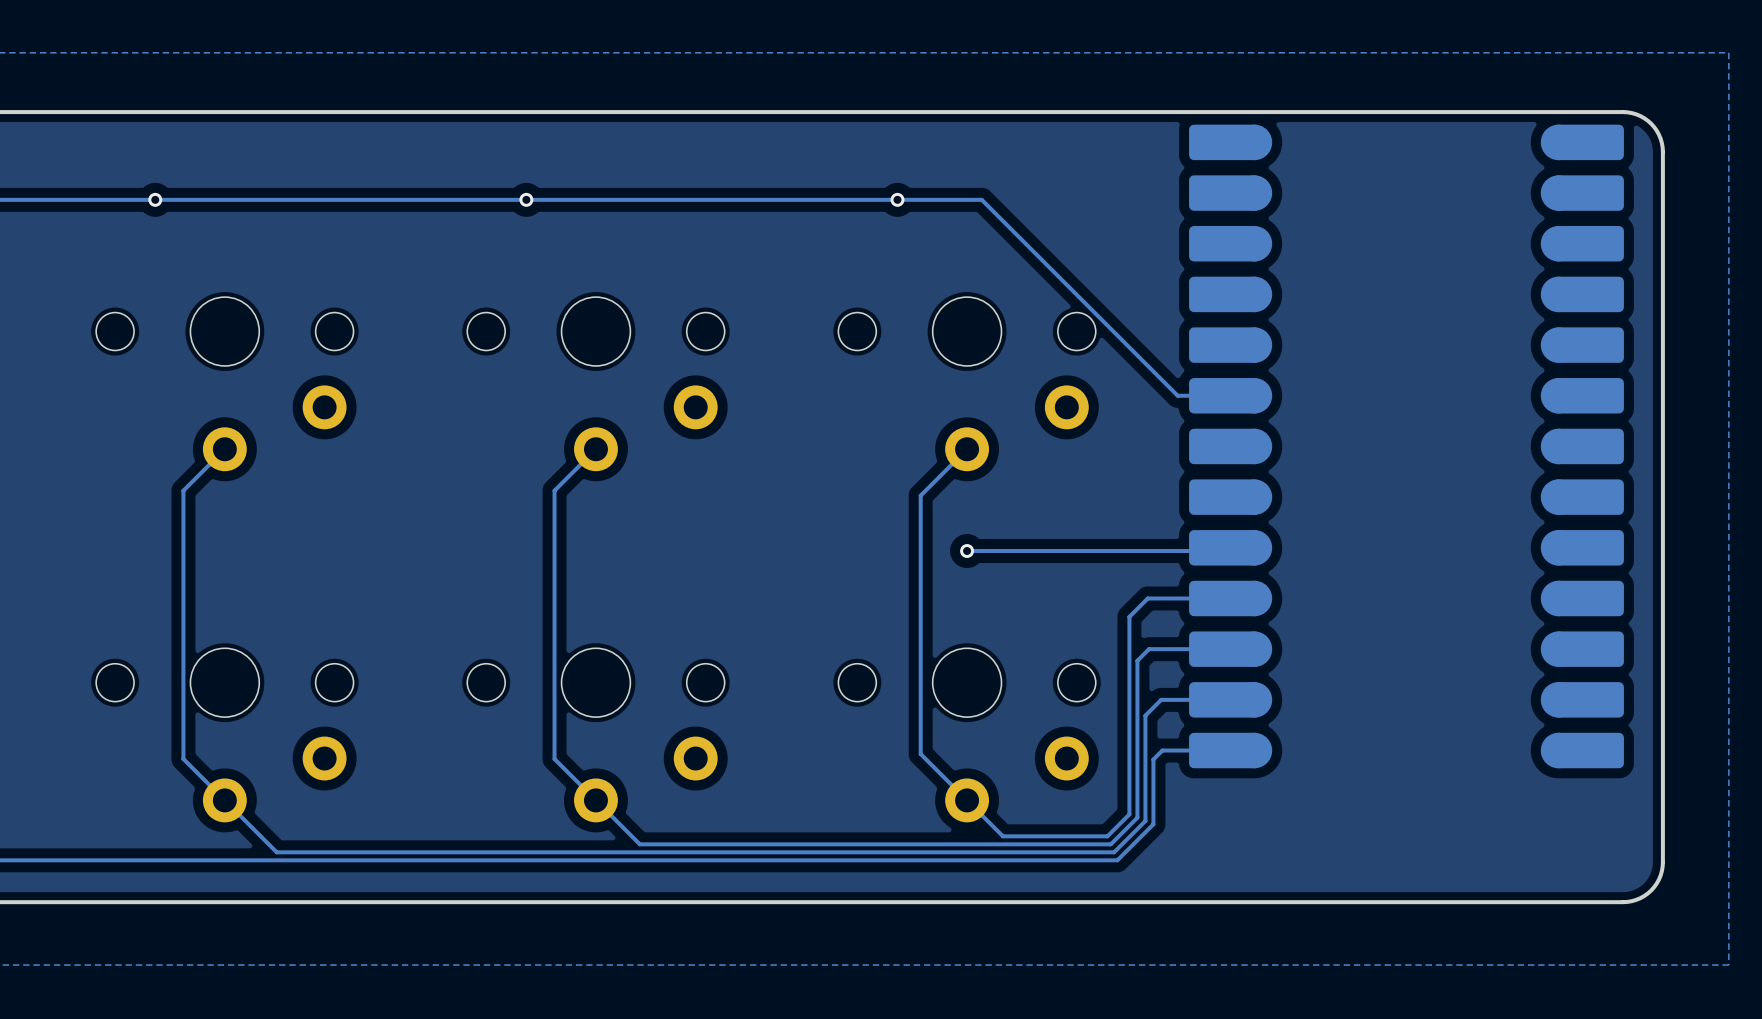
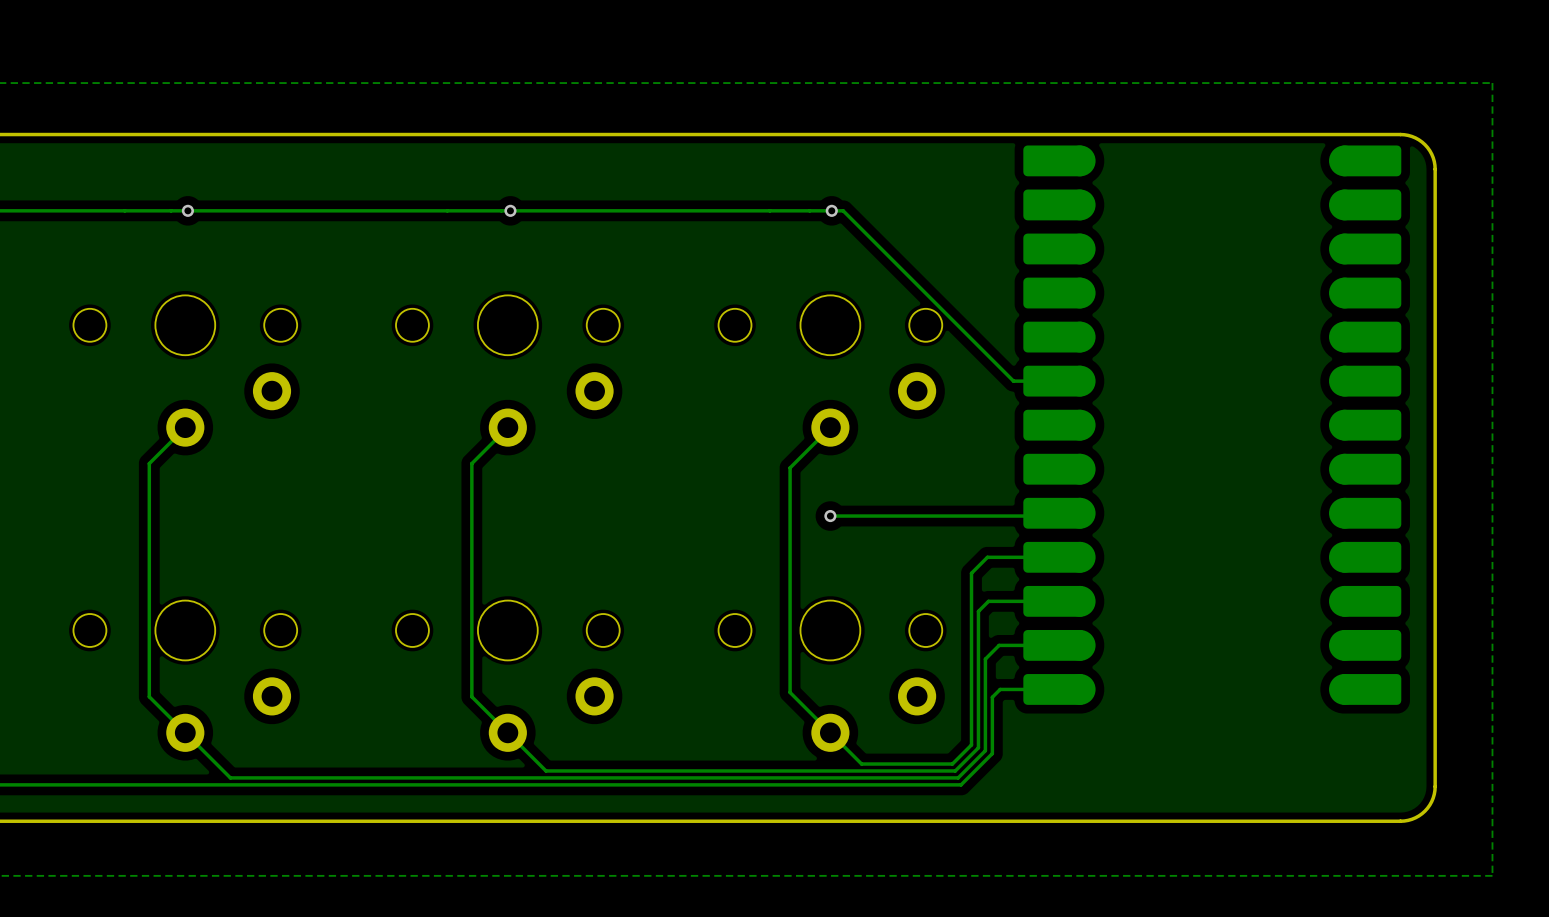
via position: (155, 199) -> (187, 210)
via position: (526, 199) -> (510, 210)
via position: (897, 199) -> (831, 210)

